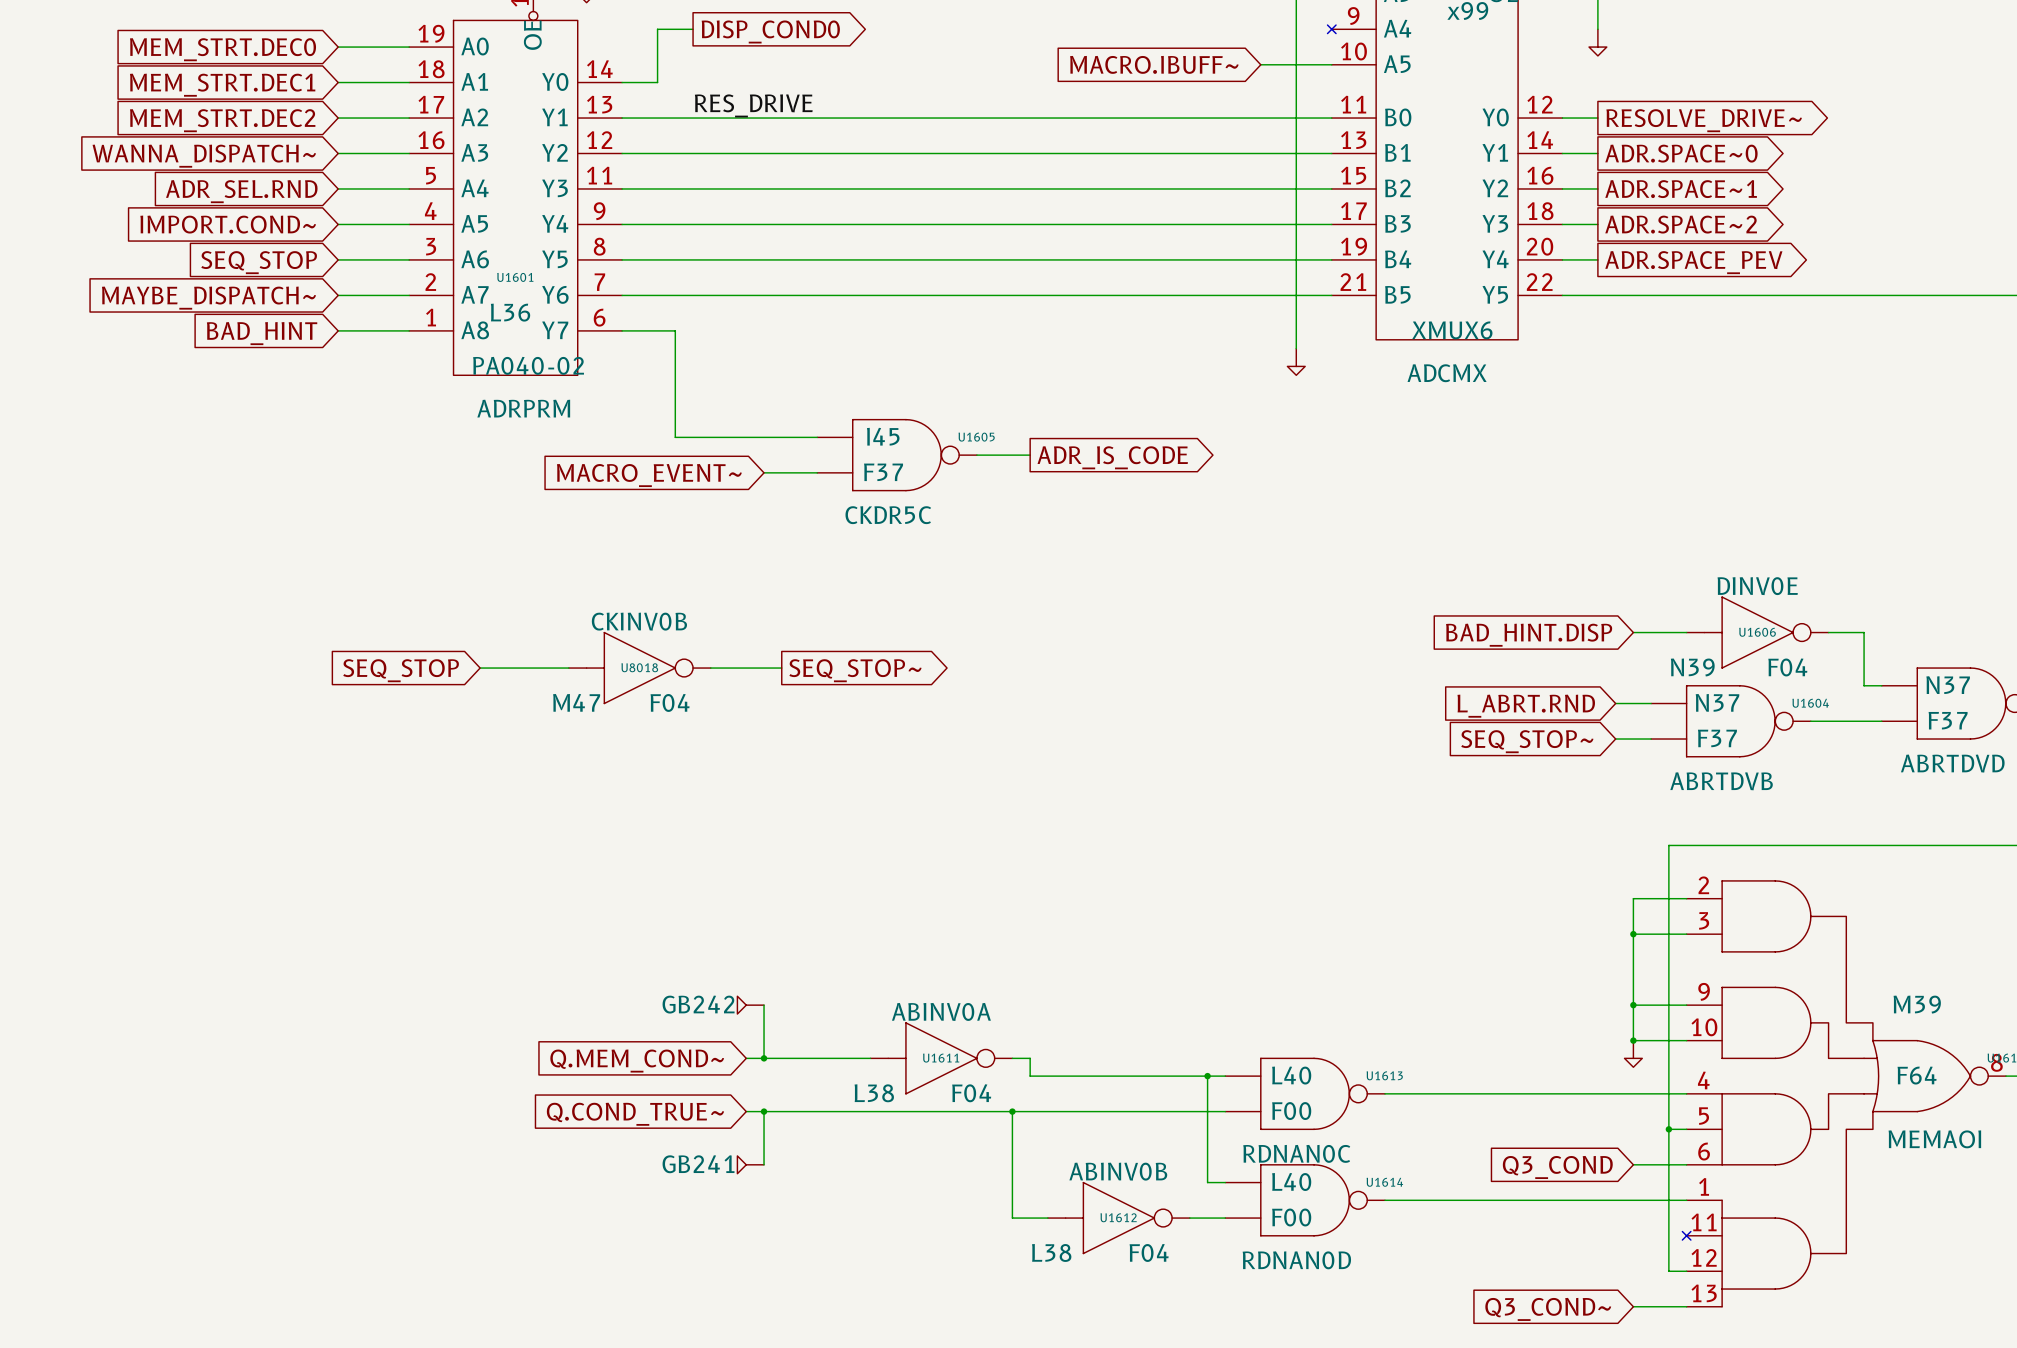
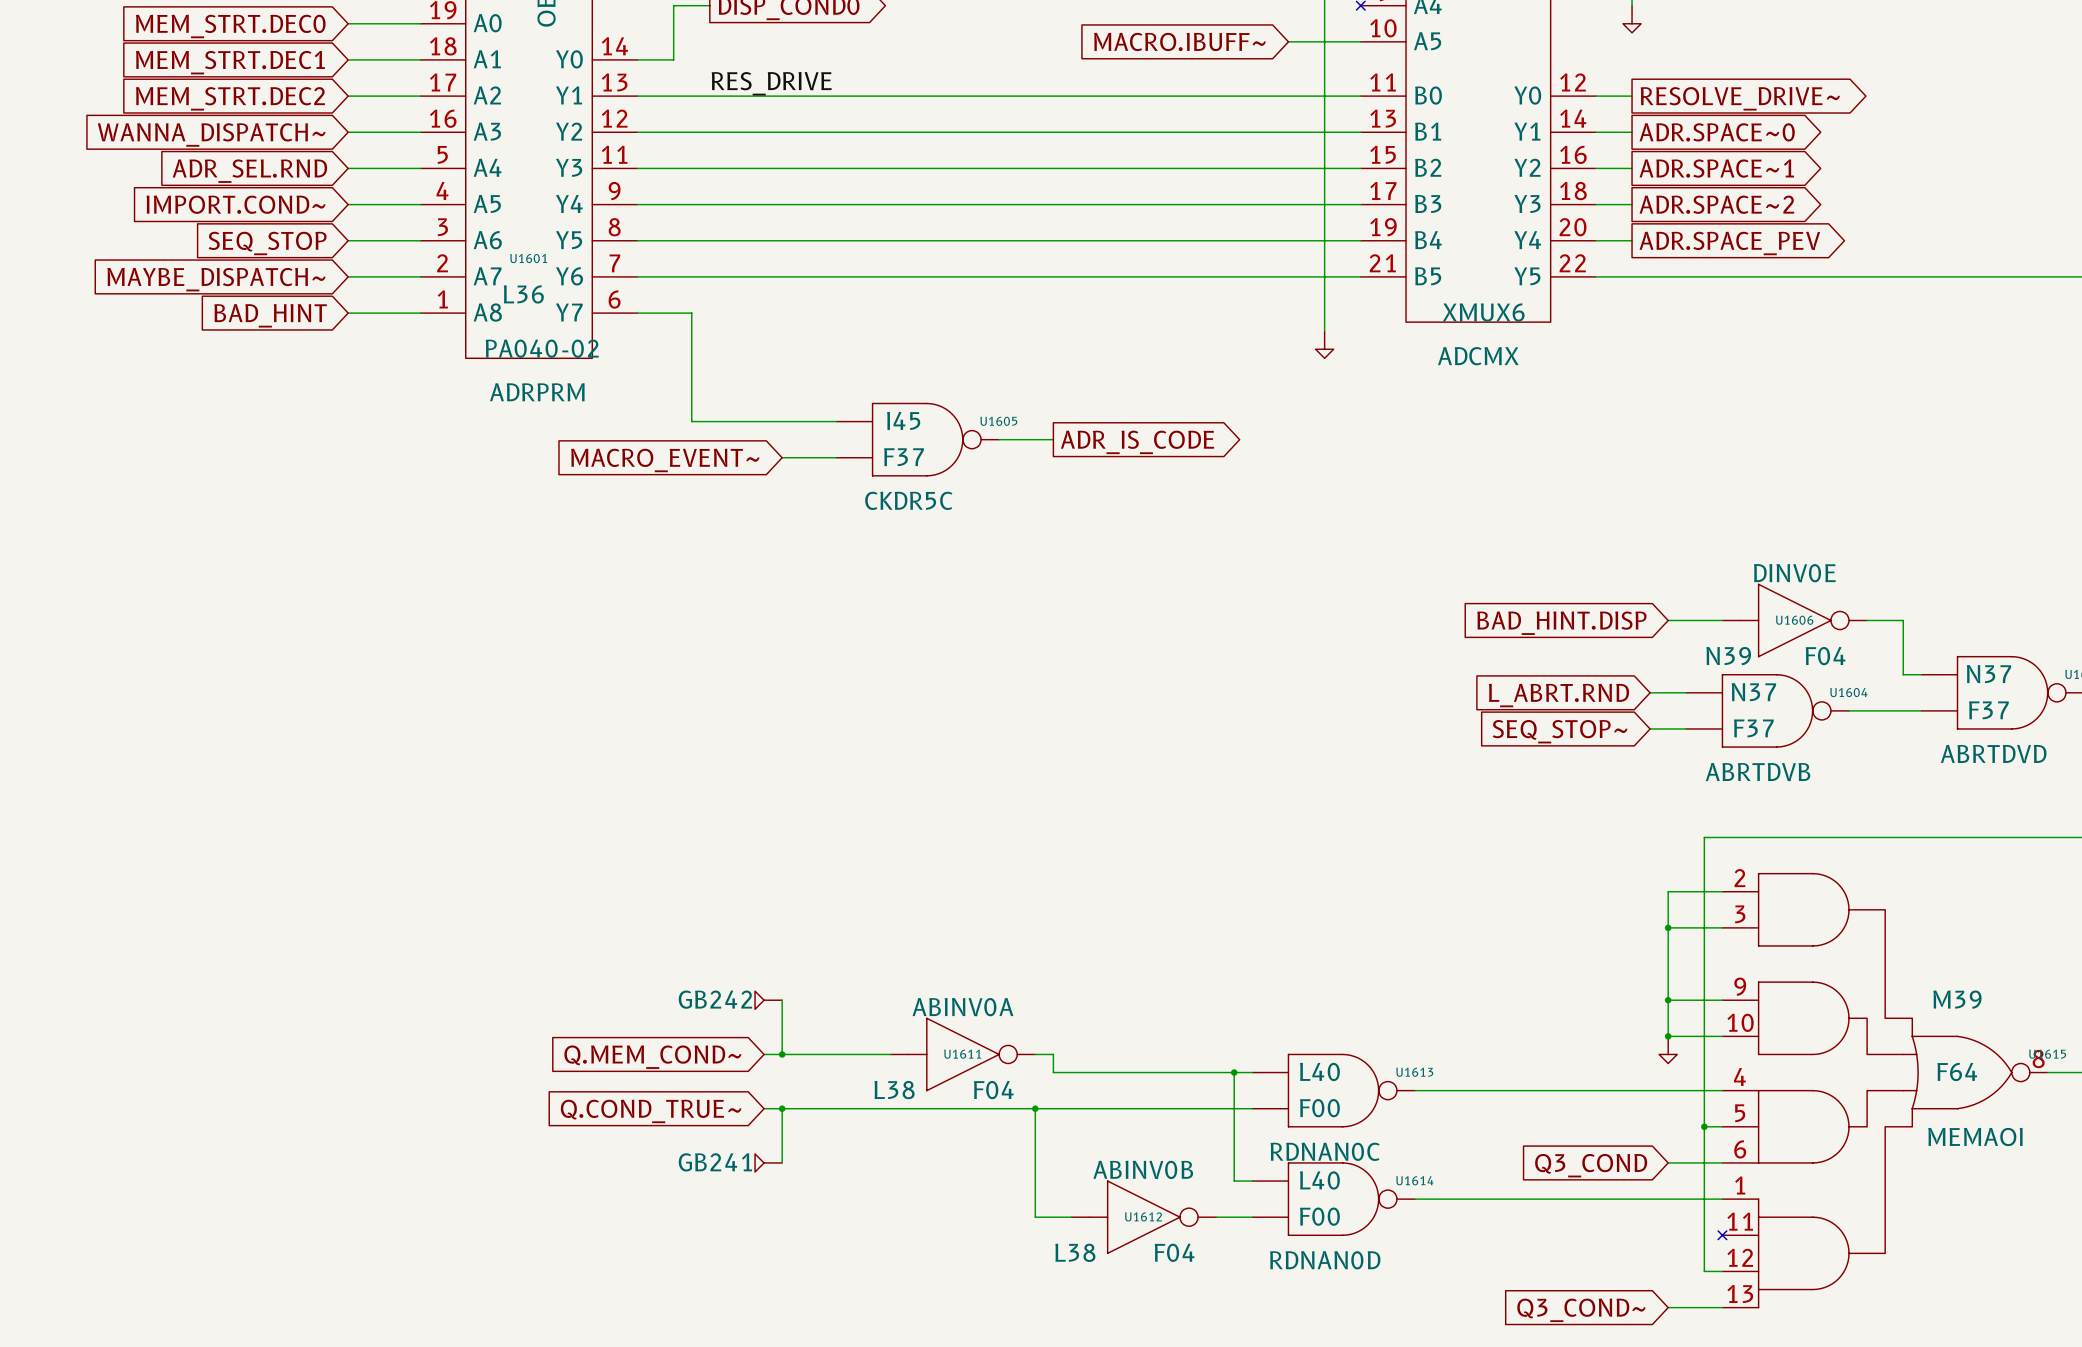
wire: (480, 668) (568, 668) -> none
U8018: F04 (639, 668) -> none
wire: (710, 668) (781, 668) -> none
global label: SEQ_STOP (401, 670) -> none
global label: SEQ_STOP~ (855, 670) -> none

